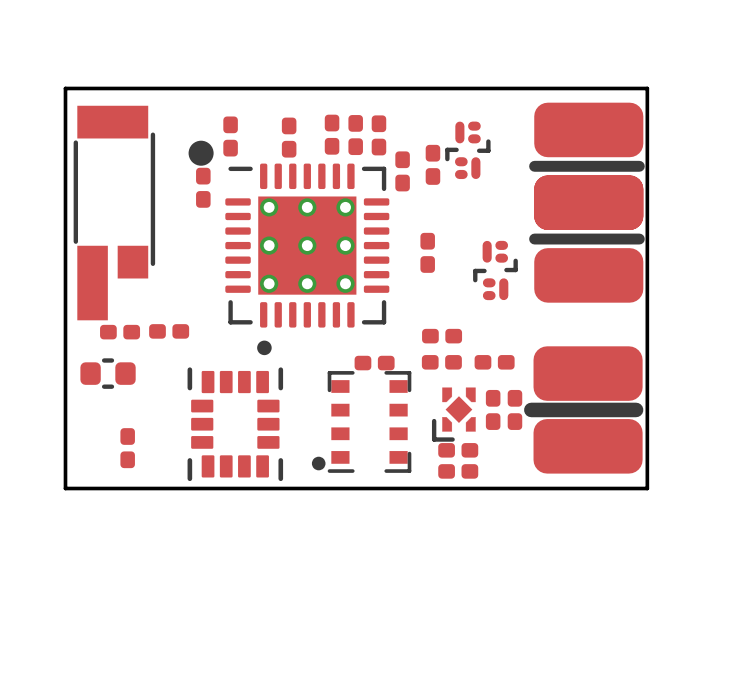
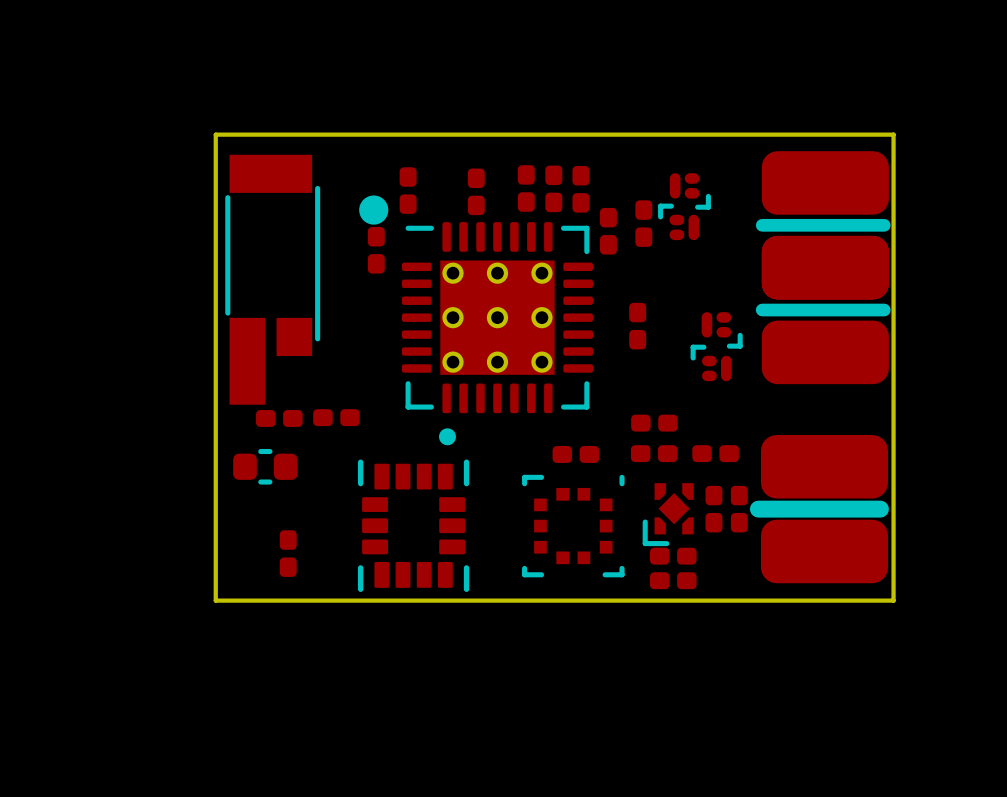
part footprint: [311, 371, 412, 473] -> [522, 474, 625, 578]

